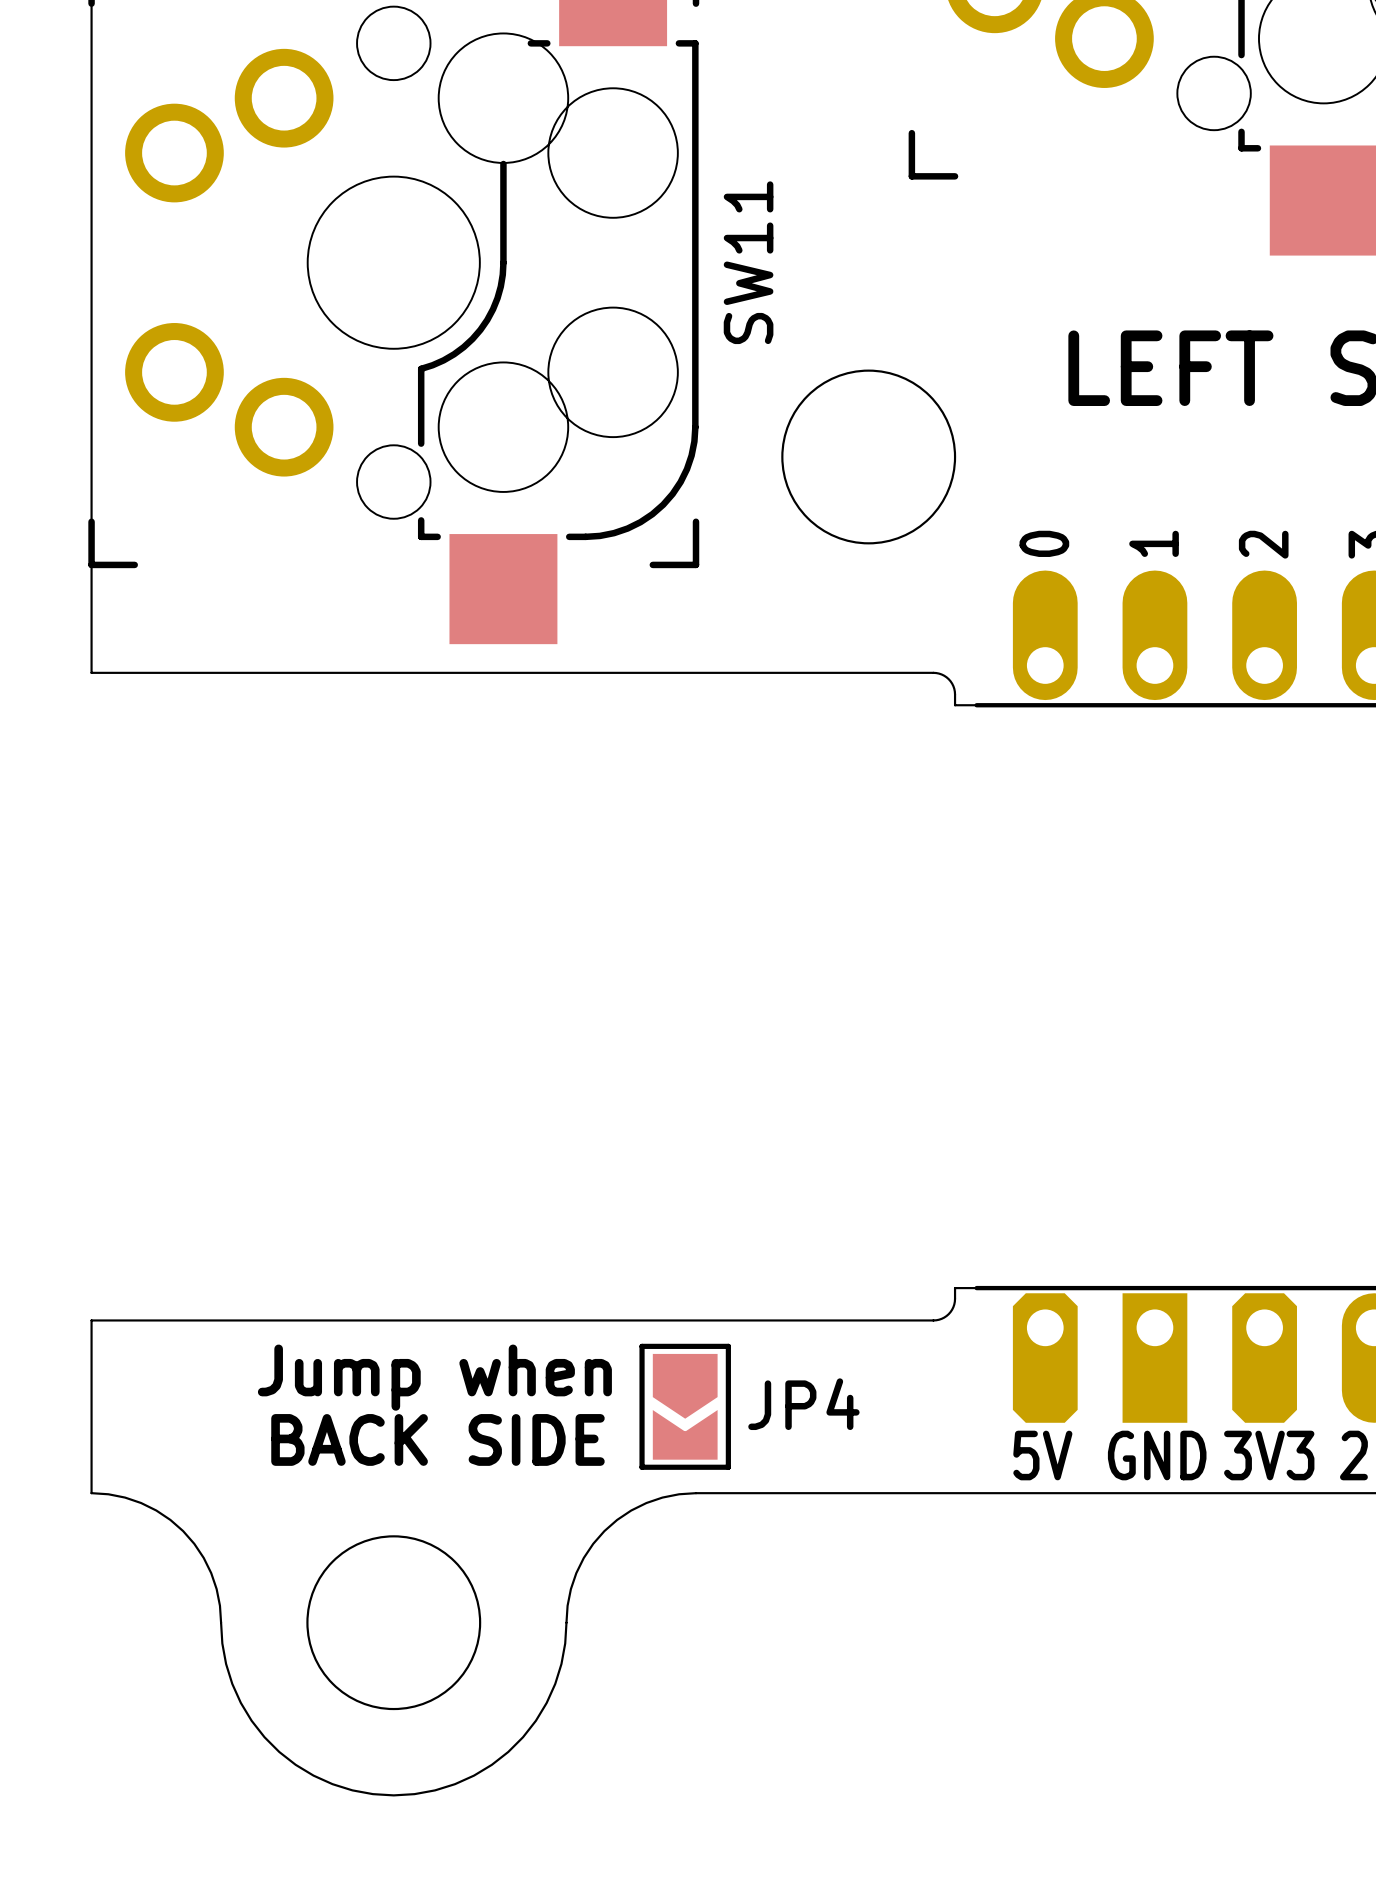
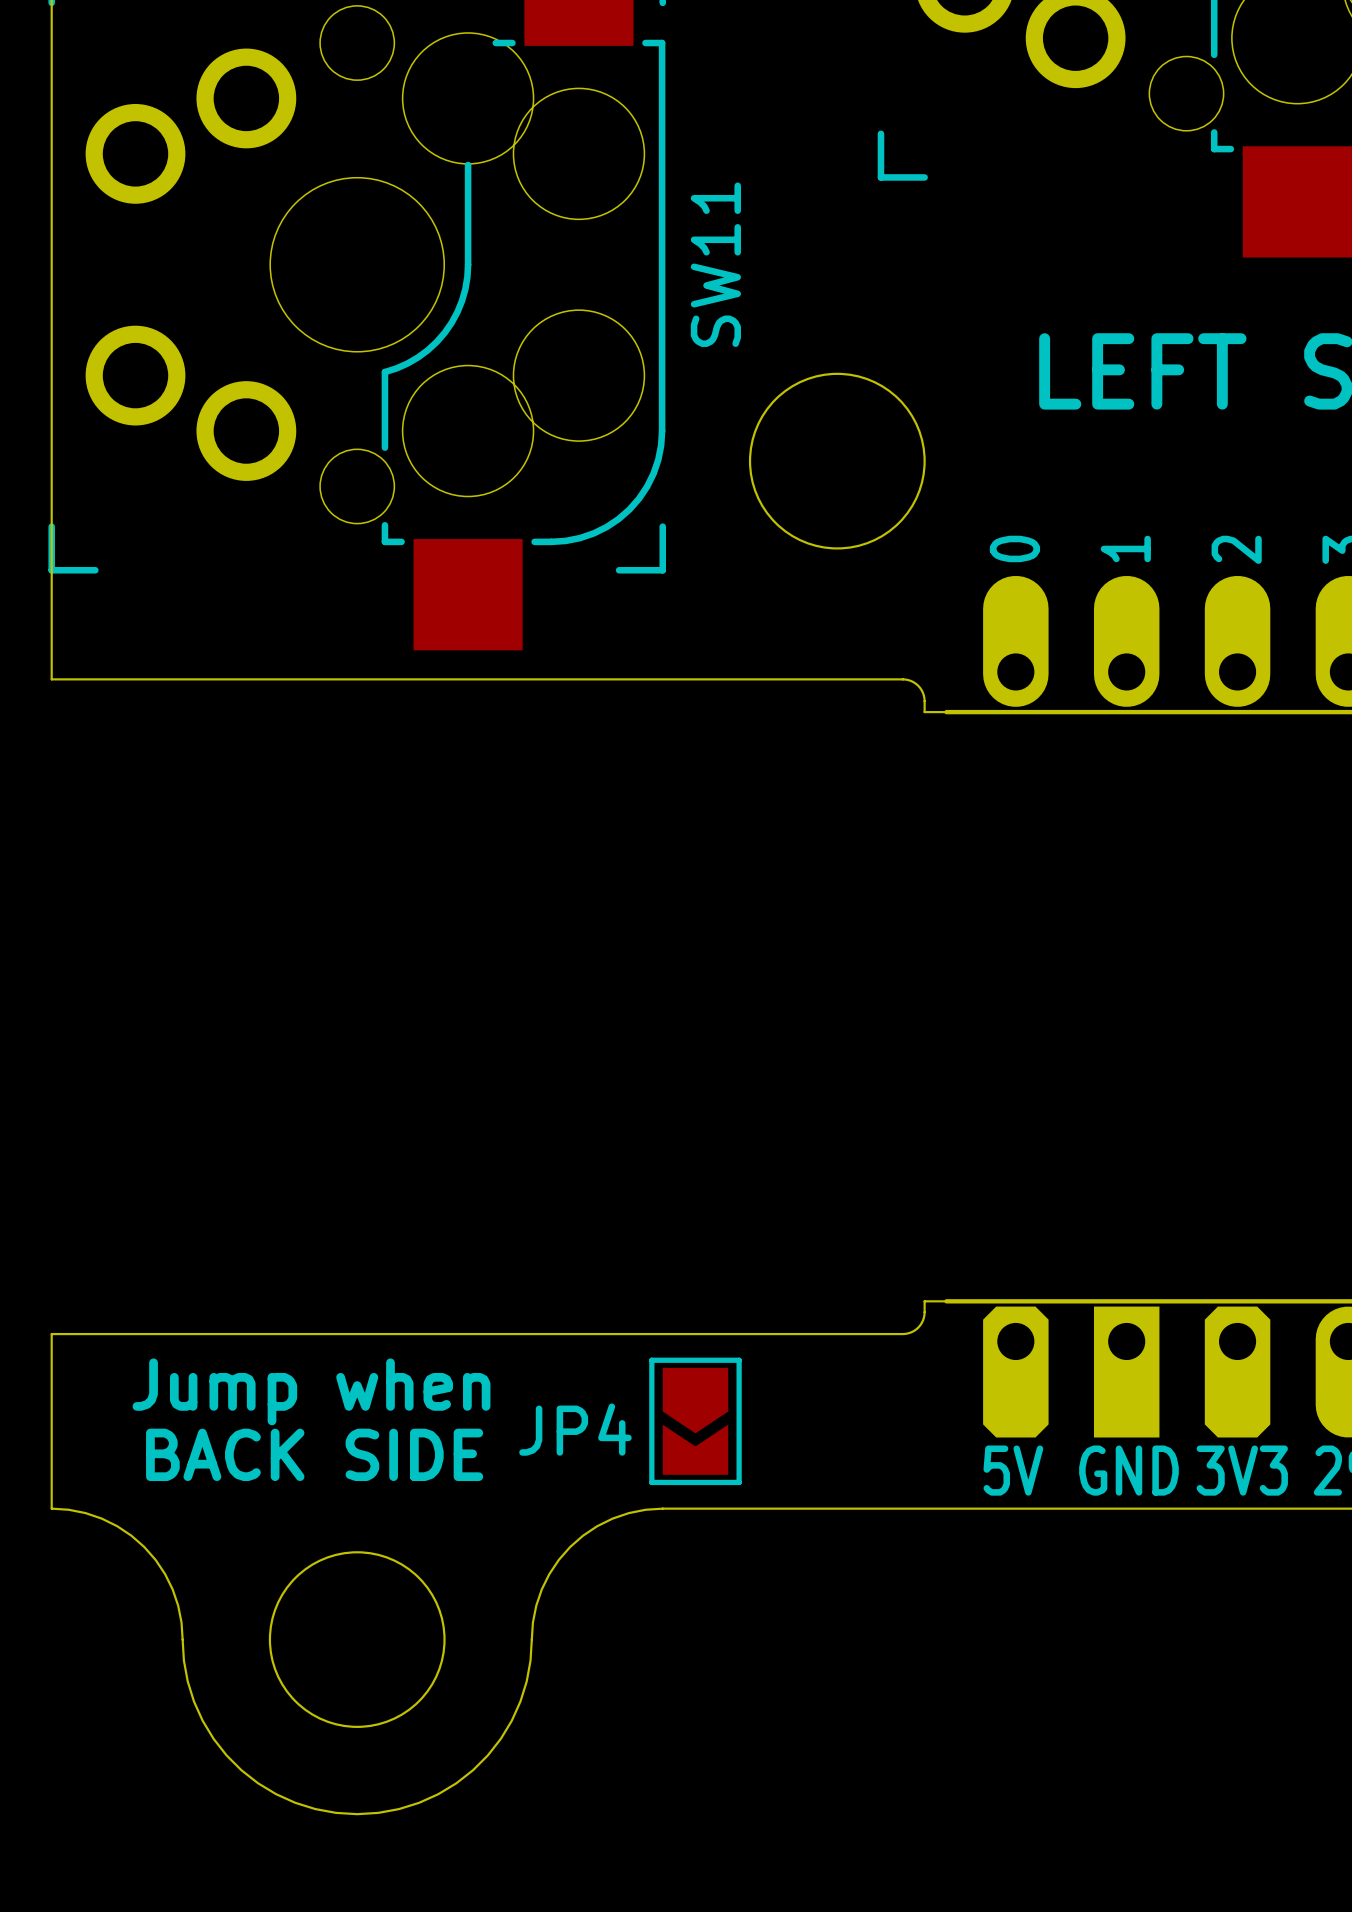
text position: Jump when (434, 1377) -> Jump when (311, 1391)
JP4 name position: JP4 (803, 1404) -> JP4 (575, 1429)
JP4 position: (685, 1406) -> (695, 1421)
text position: BACK SIDE (437, 1439) -> BACK SIDE (314, 1454)

